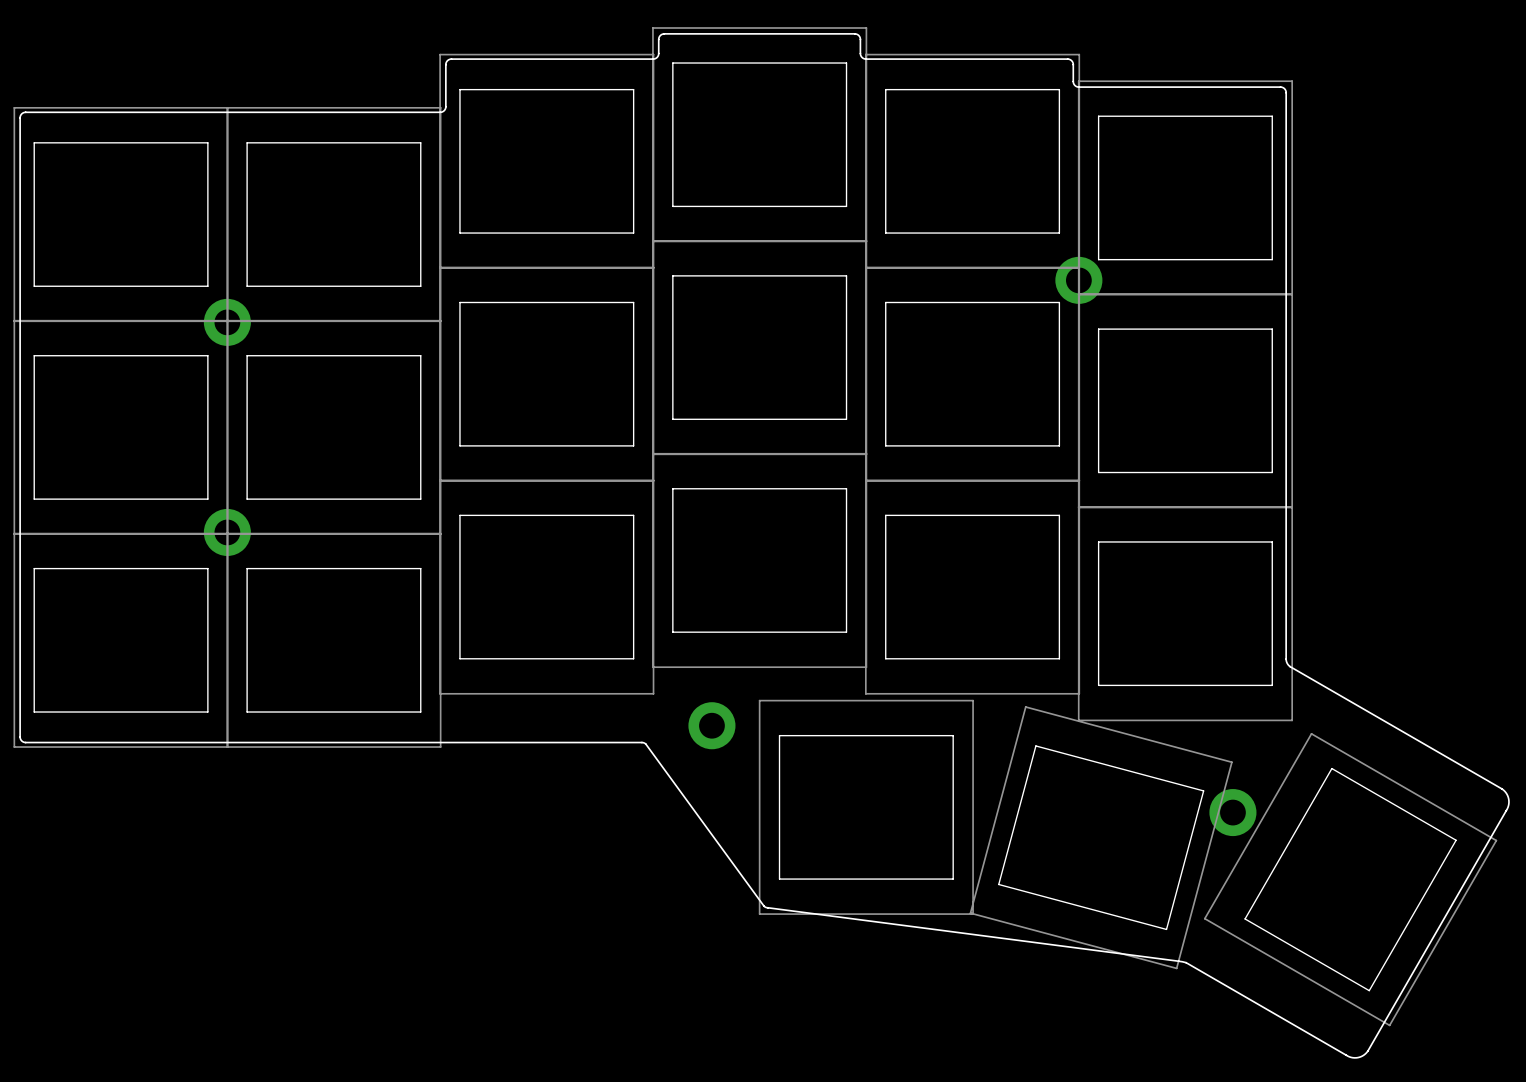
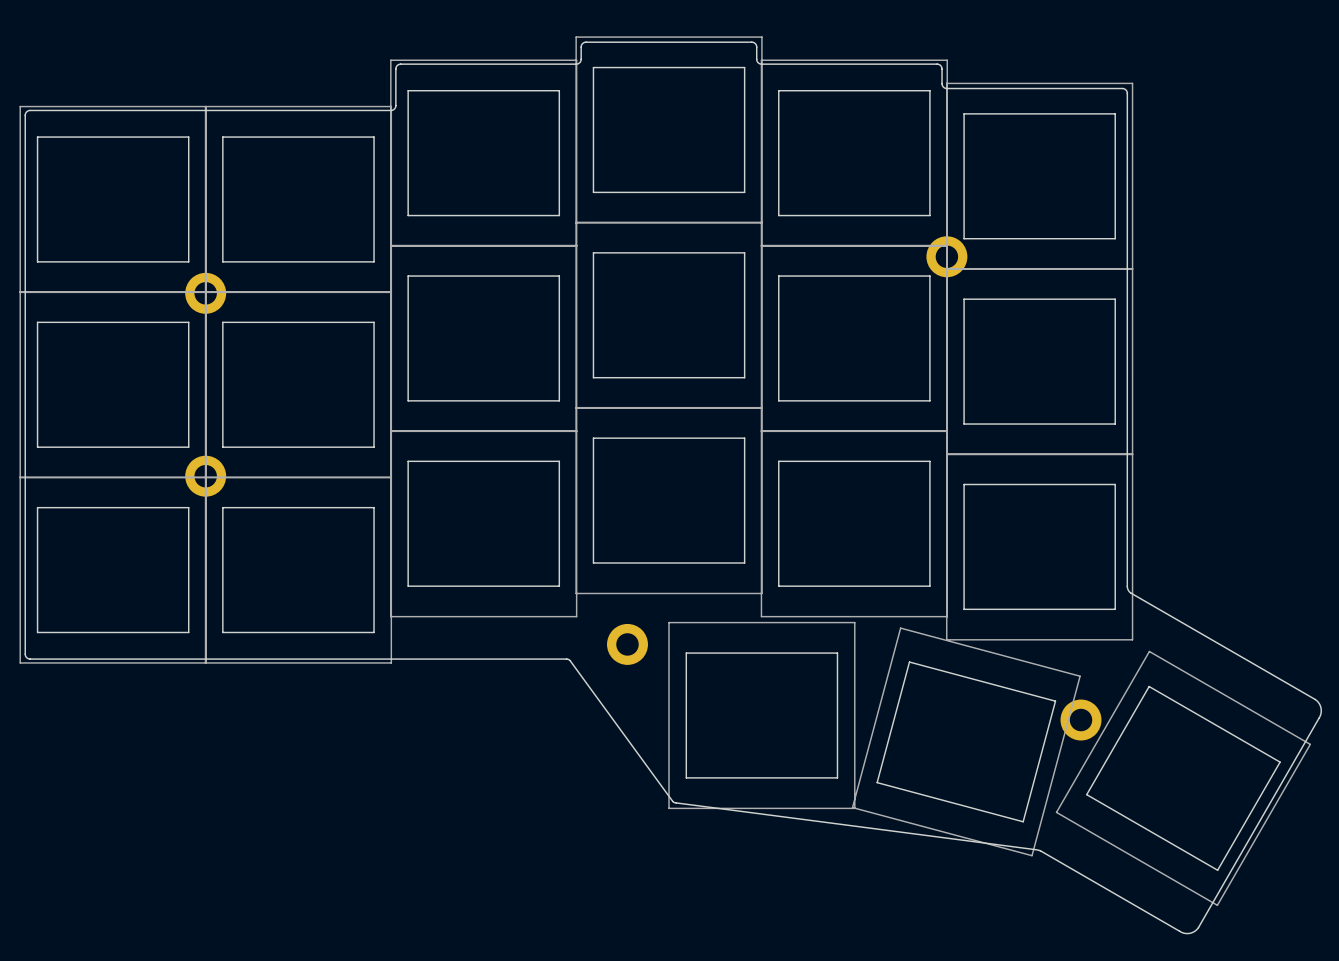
drawing shape: [1203, 732, 1498, 1027] -> [1055, 650, 1312, 907]

